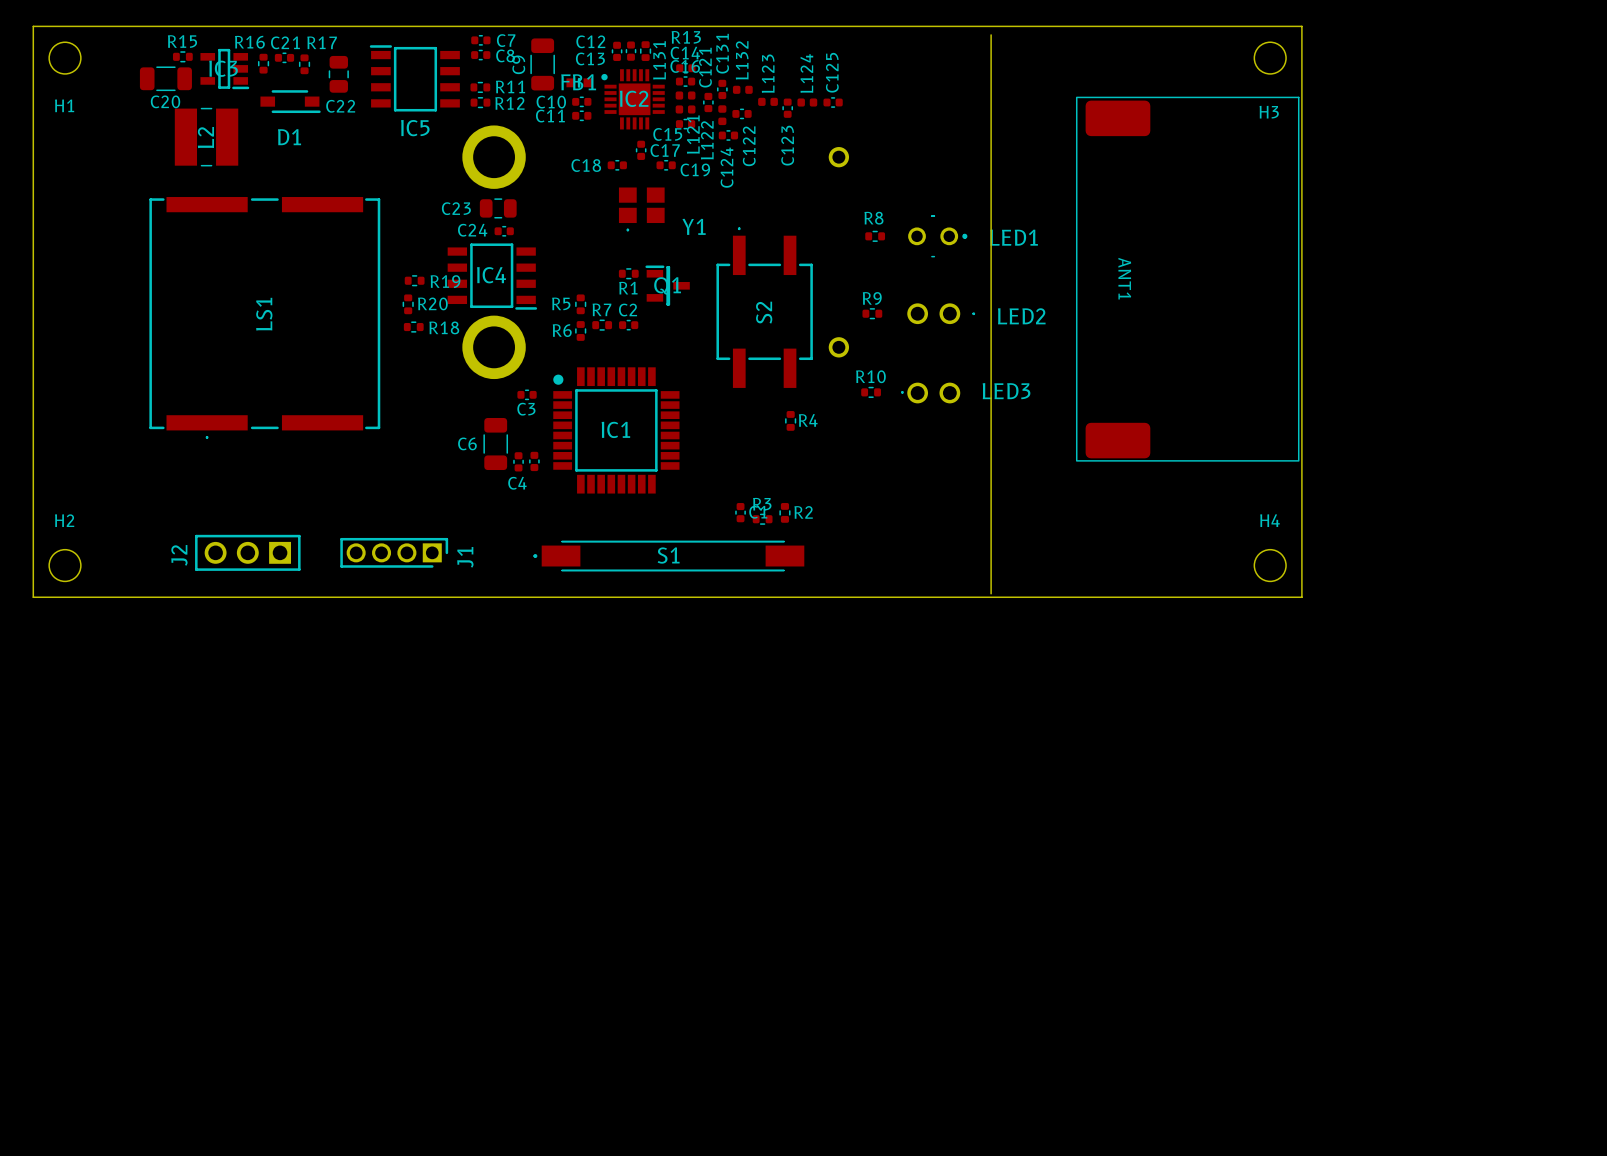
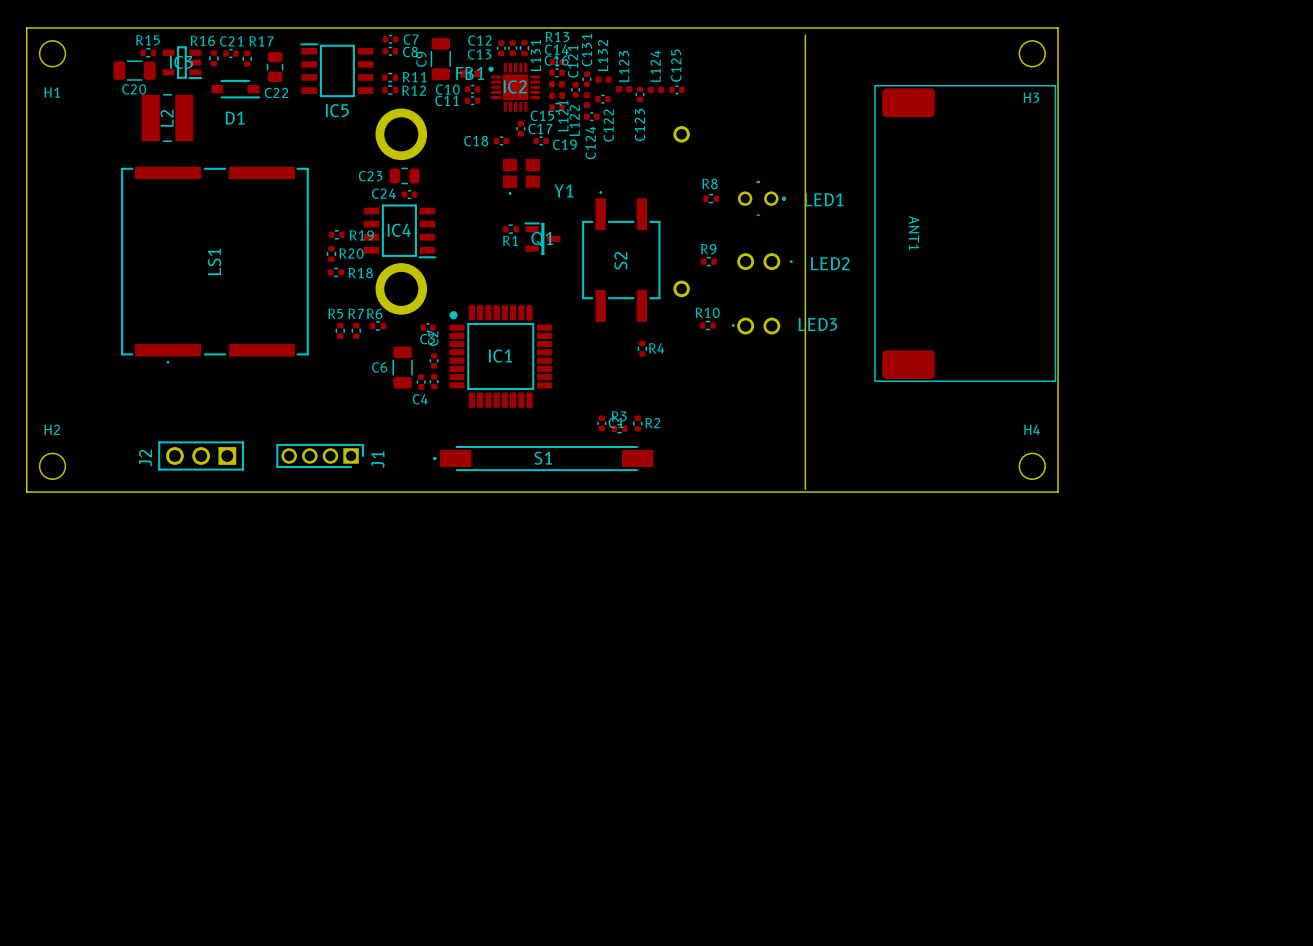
R5 name position: R5 (561, 303) -> R5 (335, 313)
R5 position: (580, 304) -> (340, 330)
R7 rotation: 0° (602, 325) -> 90° clockwise (356, 330)
R7 position: (602, 325) -> (356, 330)
C2 rotation: 0° (628, 325) -> 90° clockwise (434, 360)
C2 position: (628, 325) -> (434, 360)
R6 rotation: 0° (580, 330) -> 90° clockwise (377, 326)
R6 position: (580, 330) -> (377, 326)

